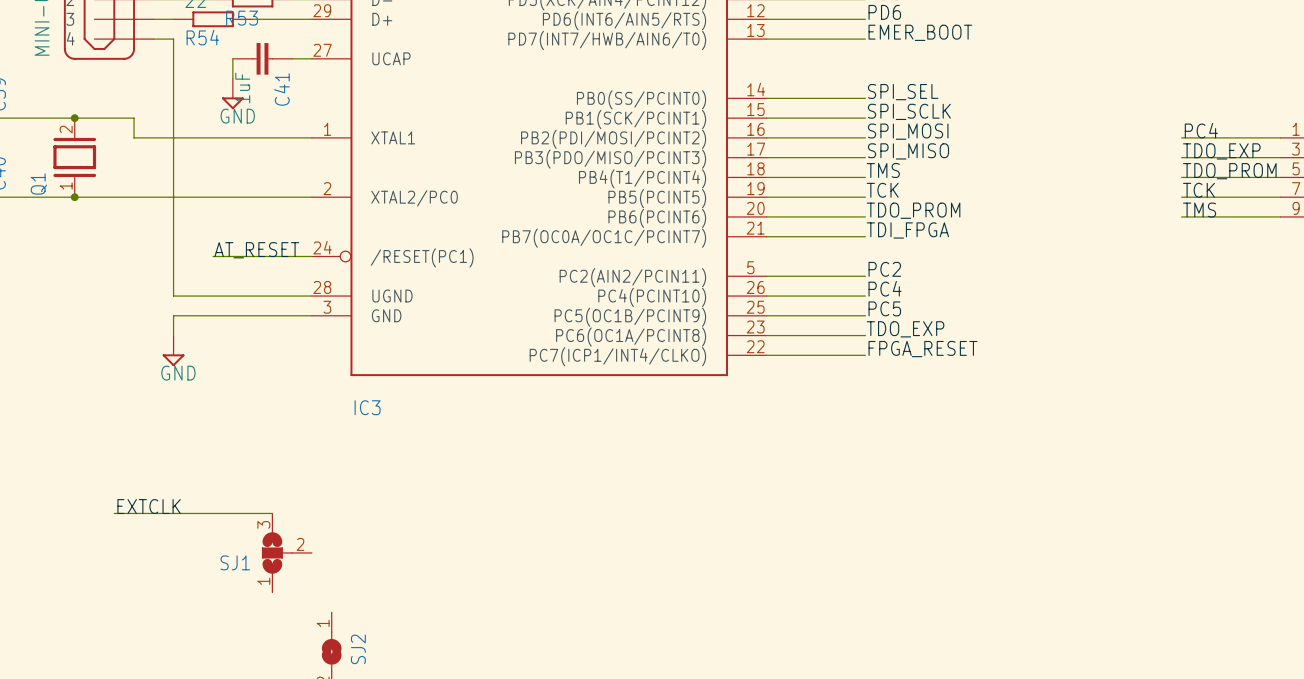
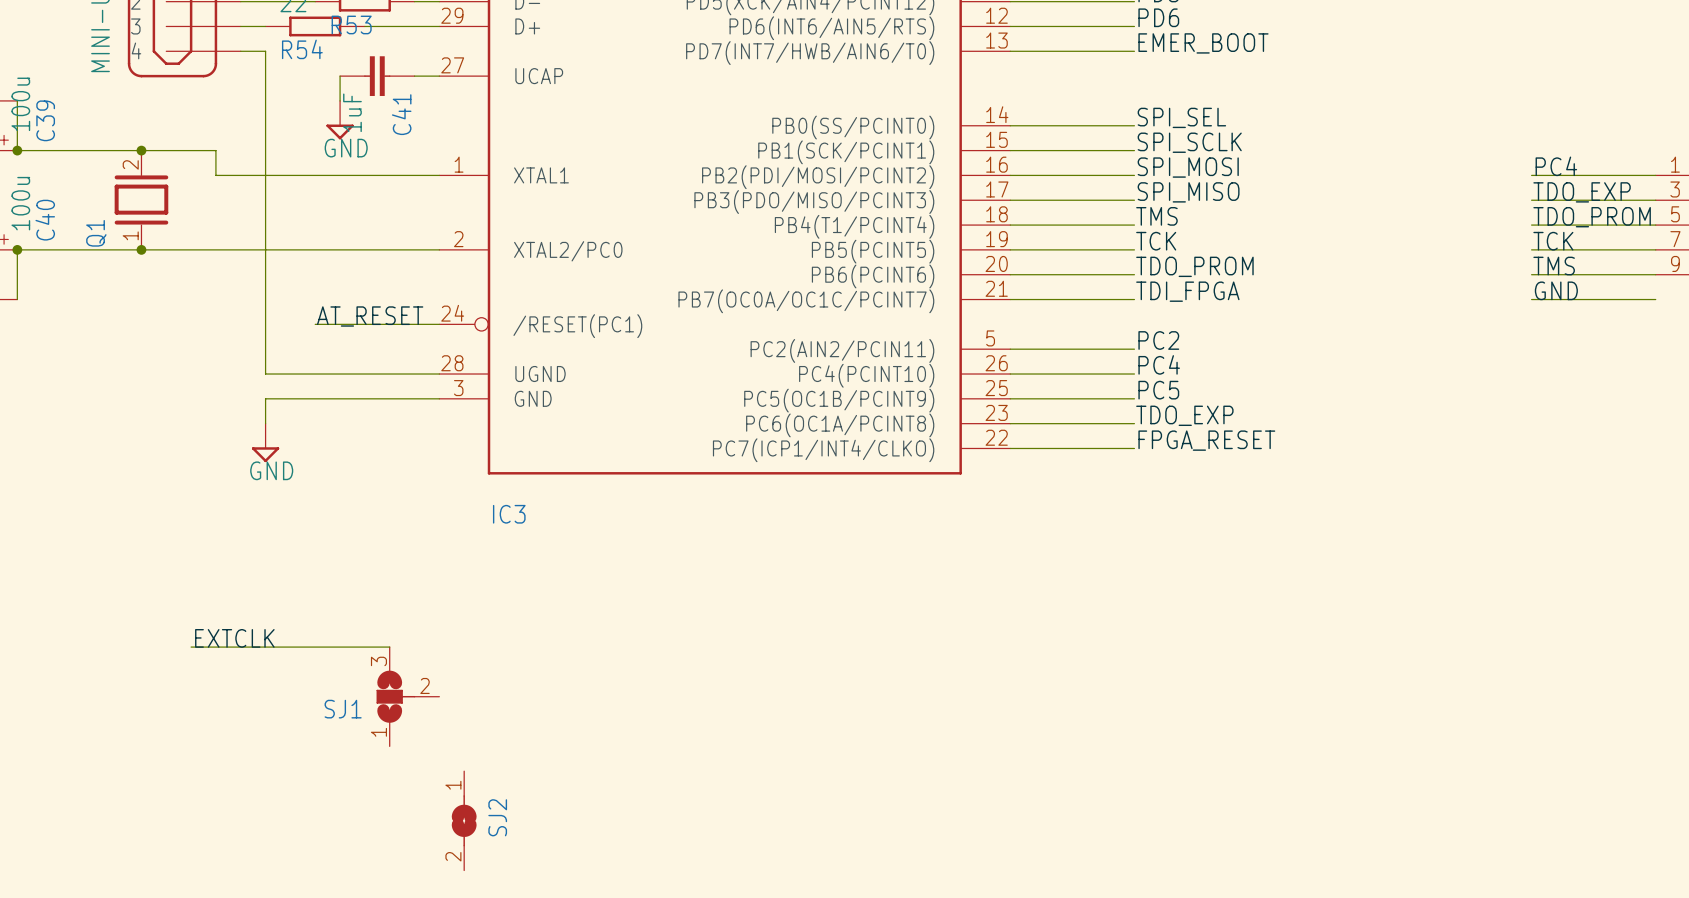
label: none -> GND (1556, 290)
wire: none -> (1531, 299) (1655, 299)

